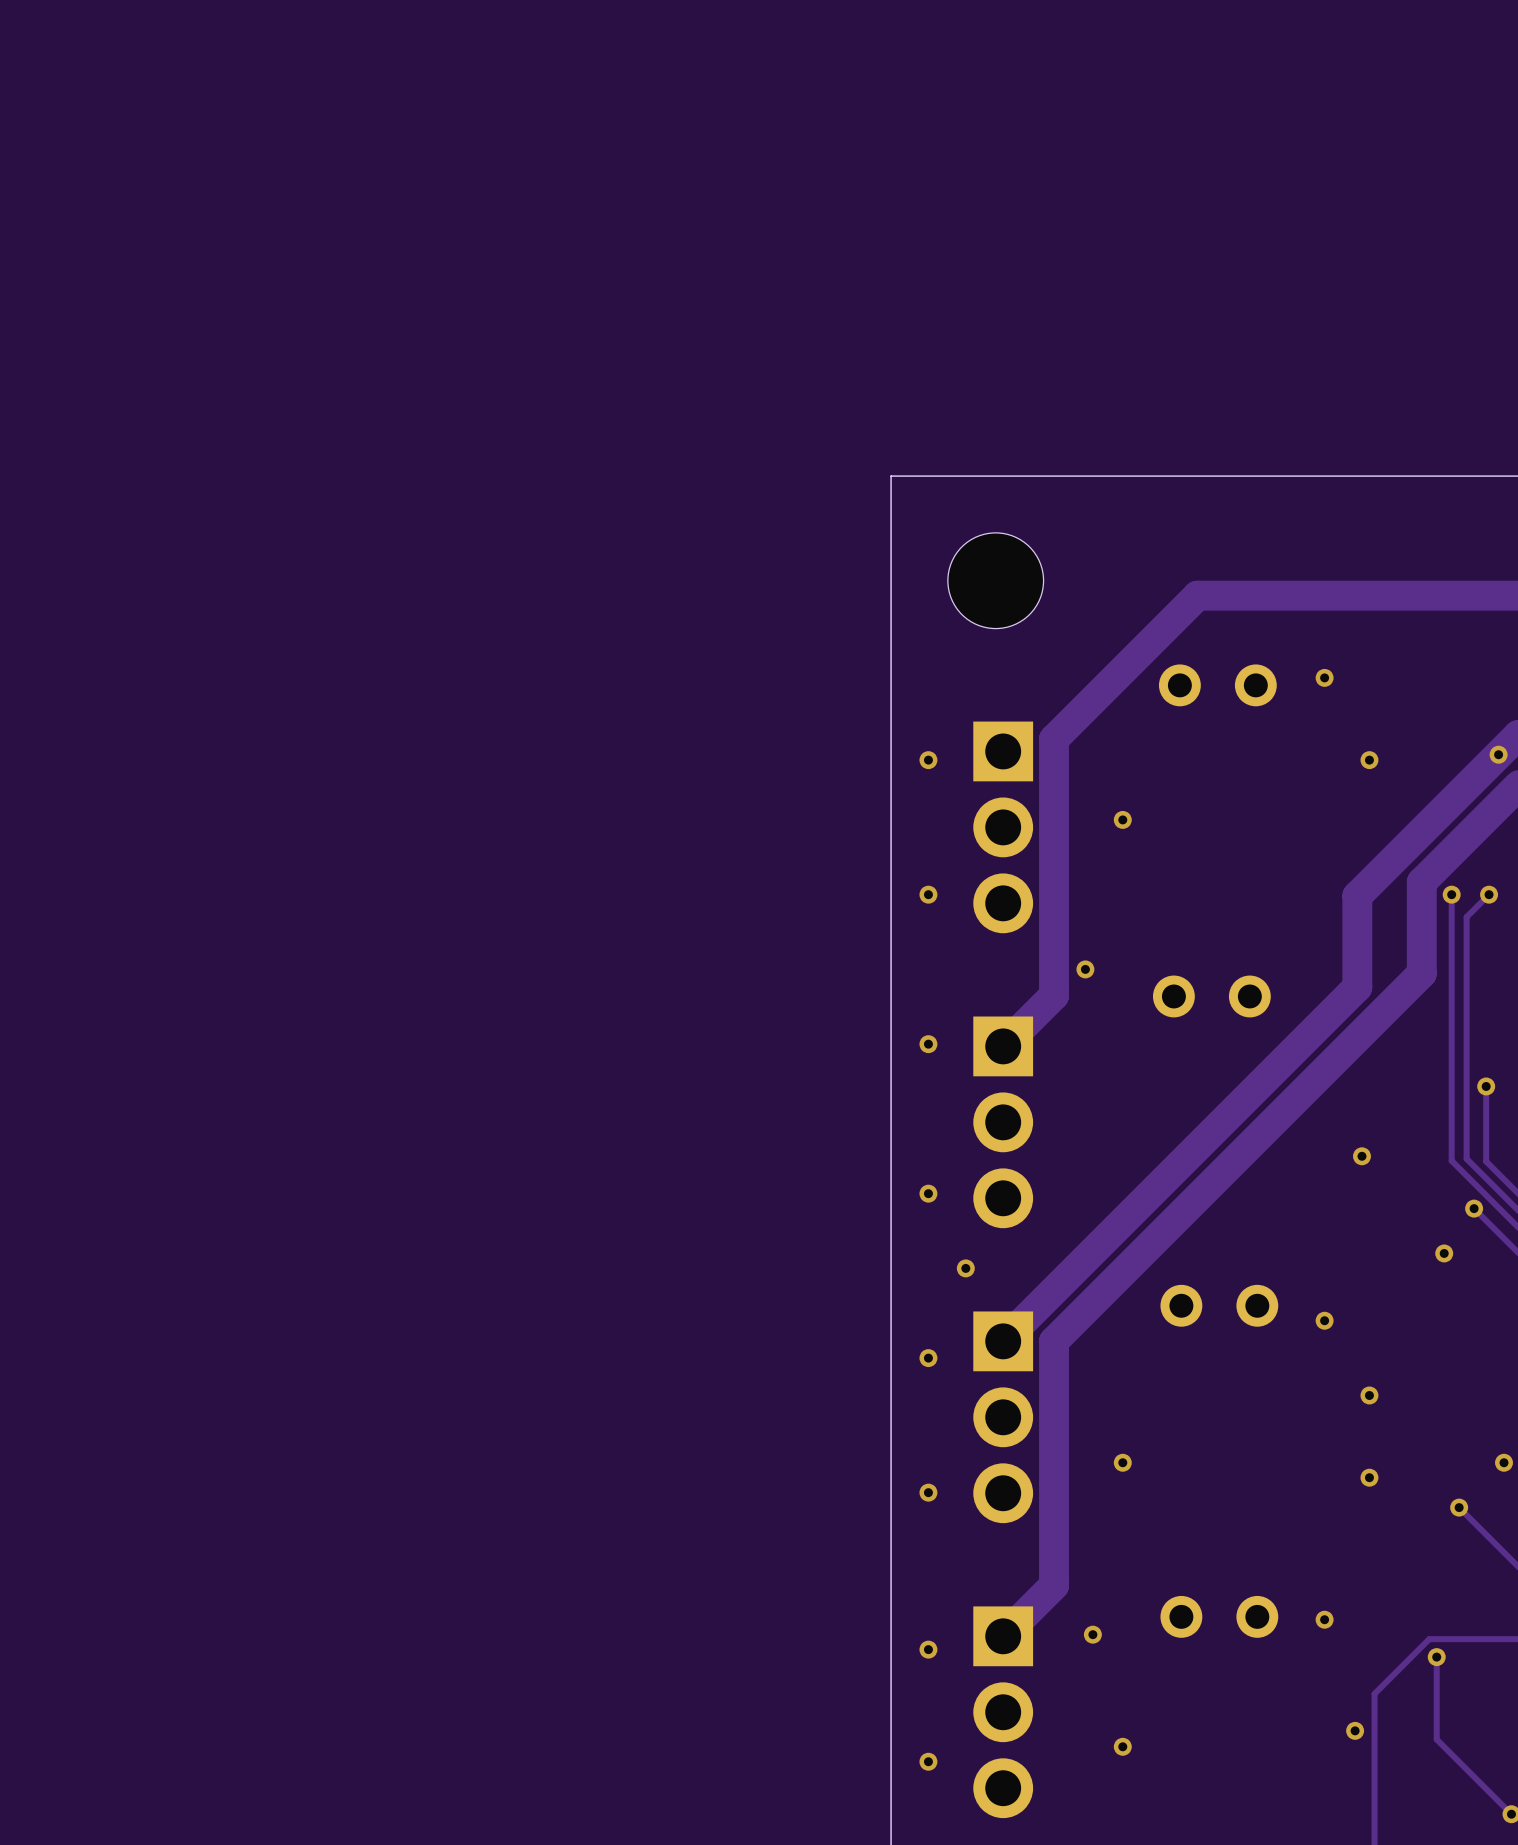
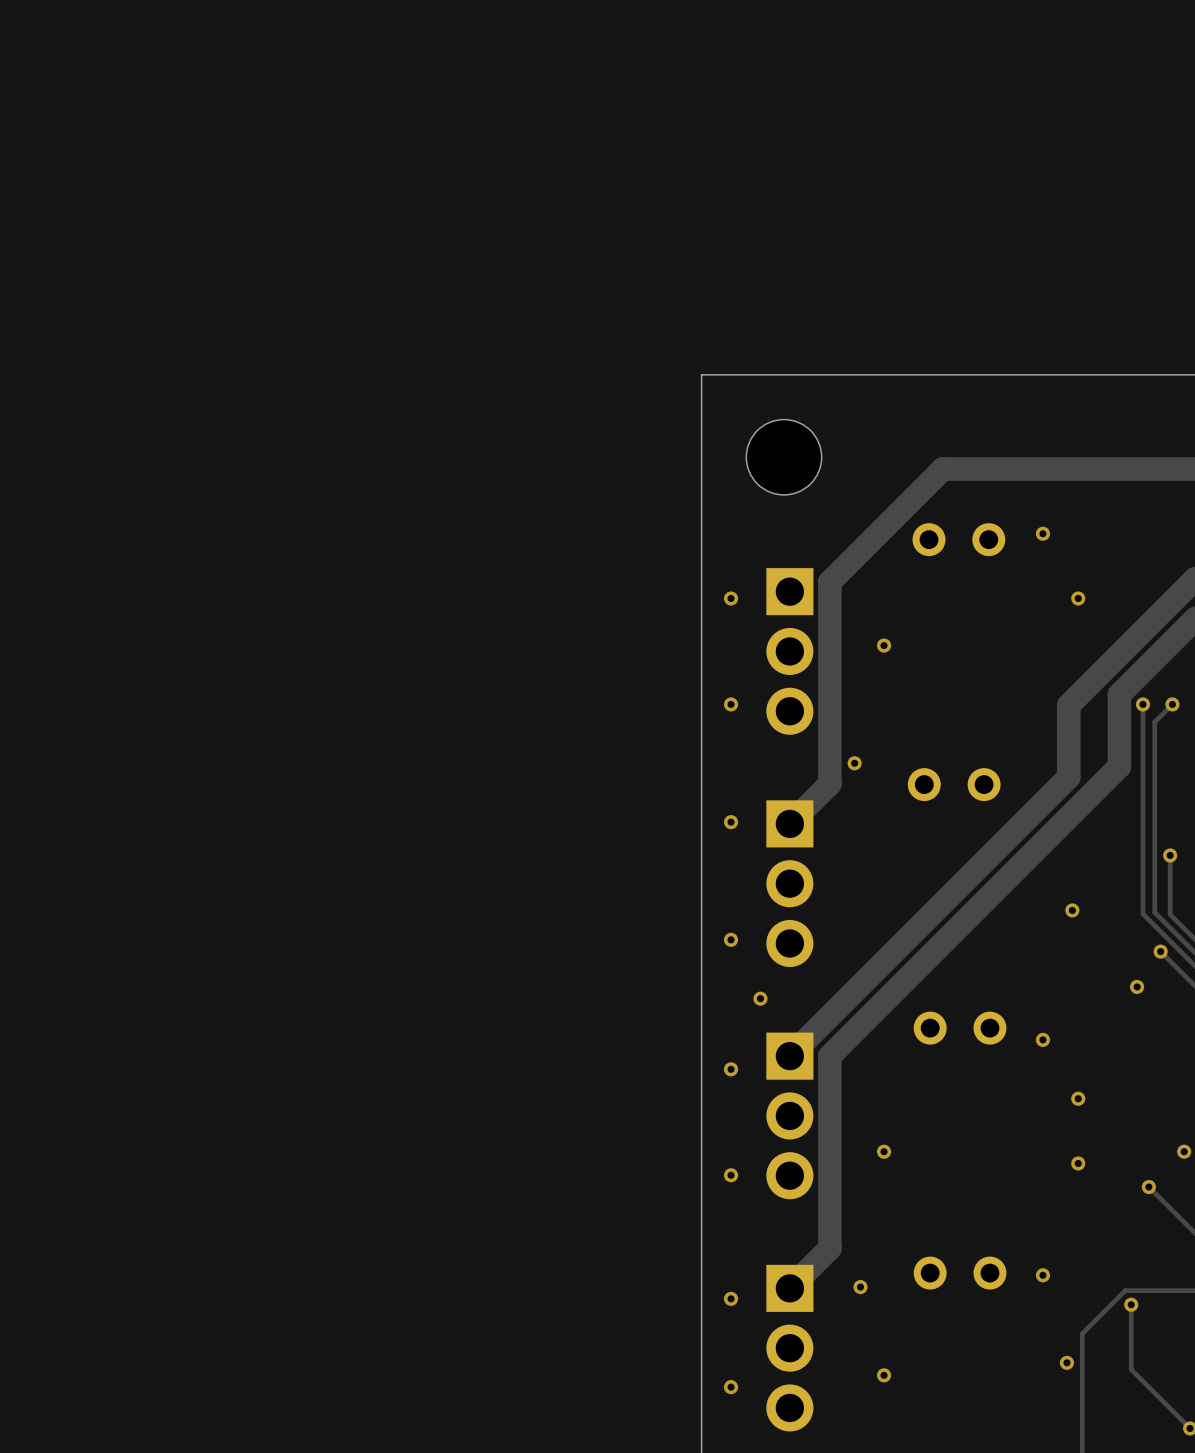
via: (1498, 754) -> none

